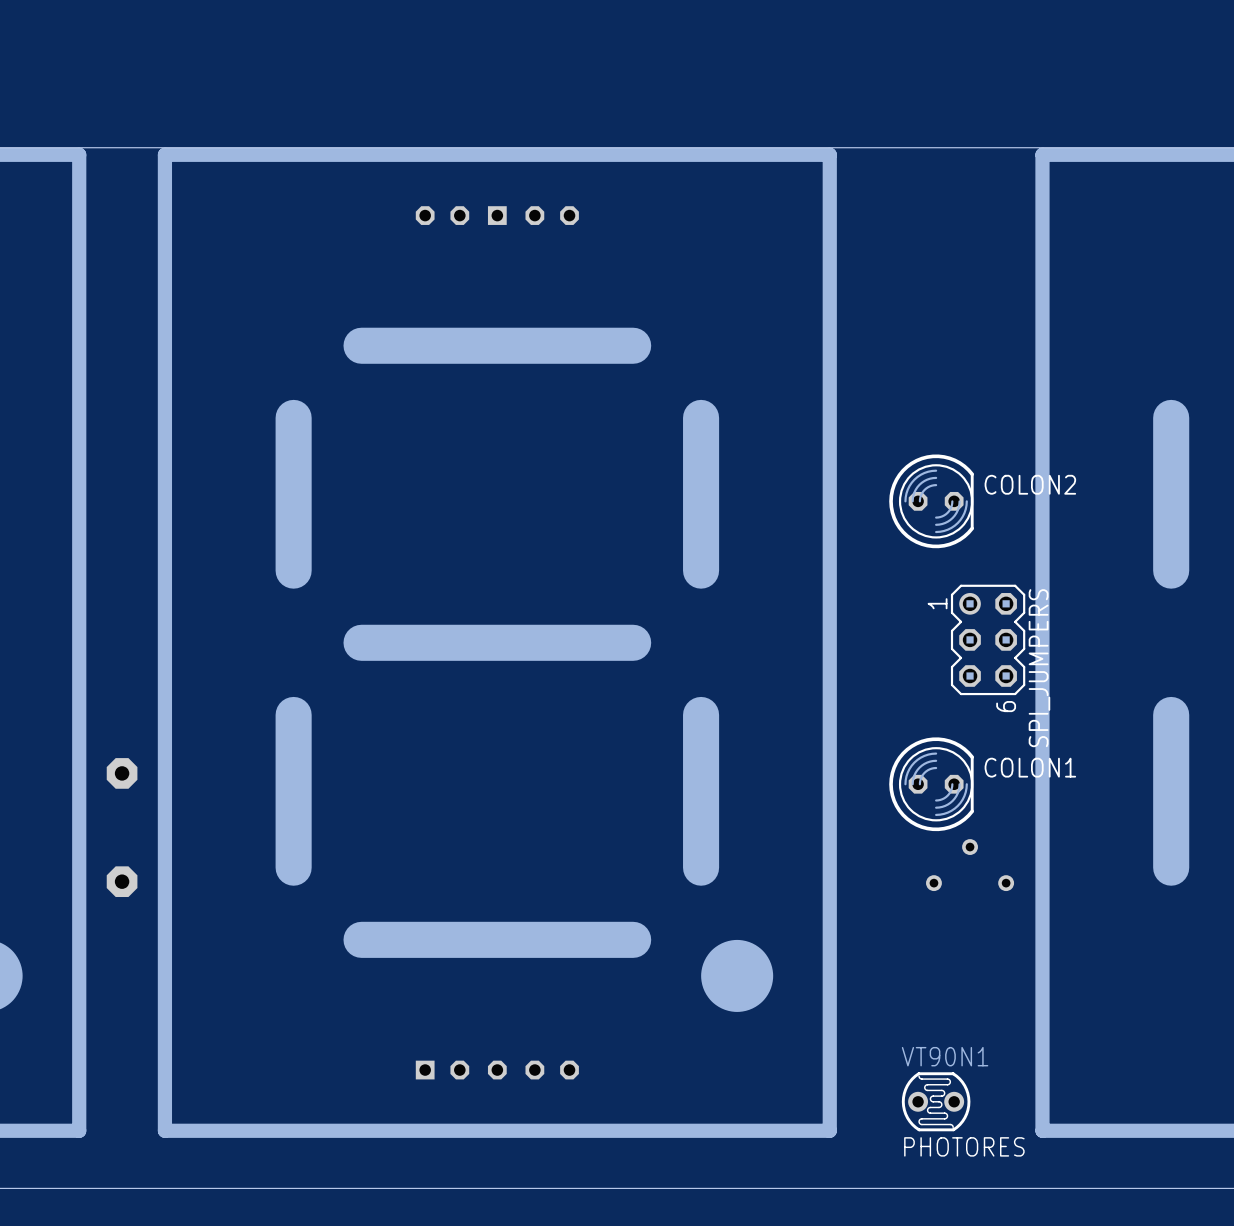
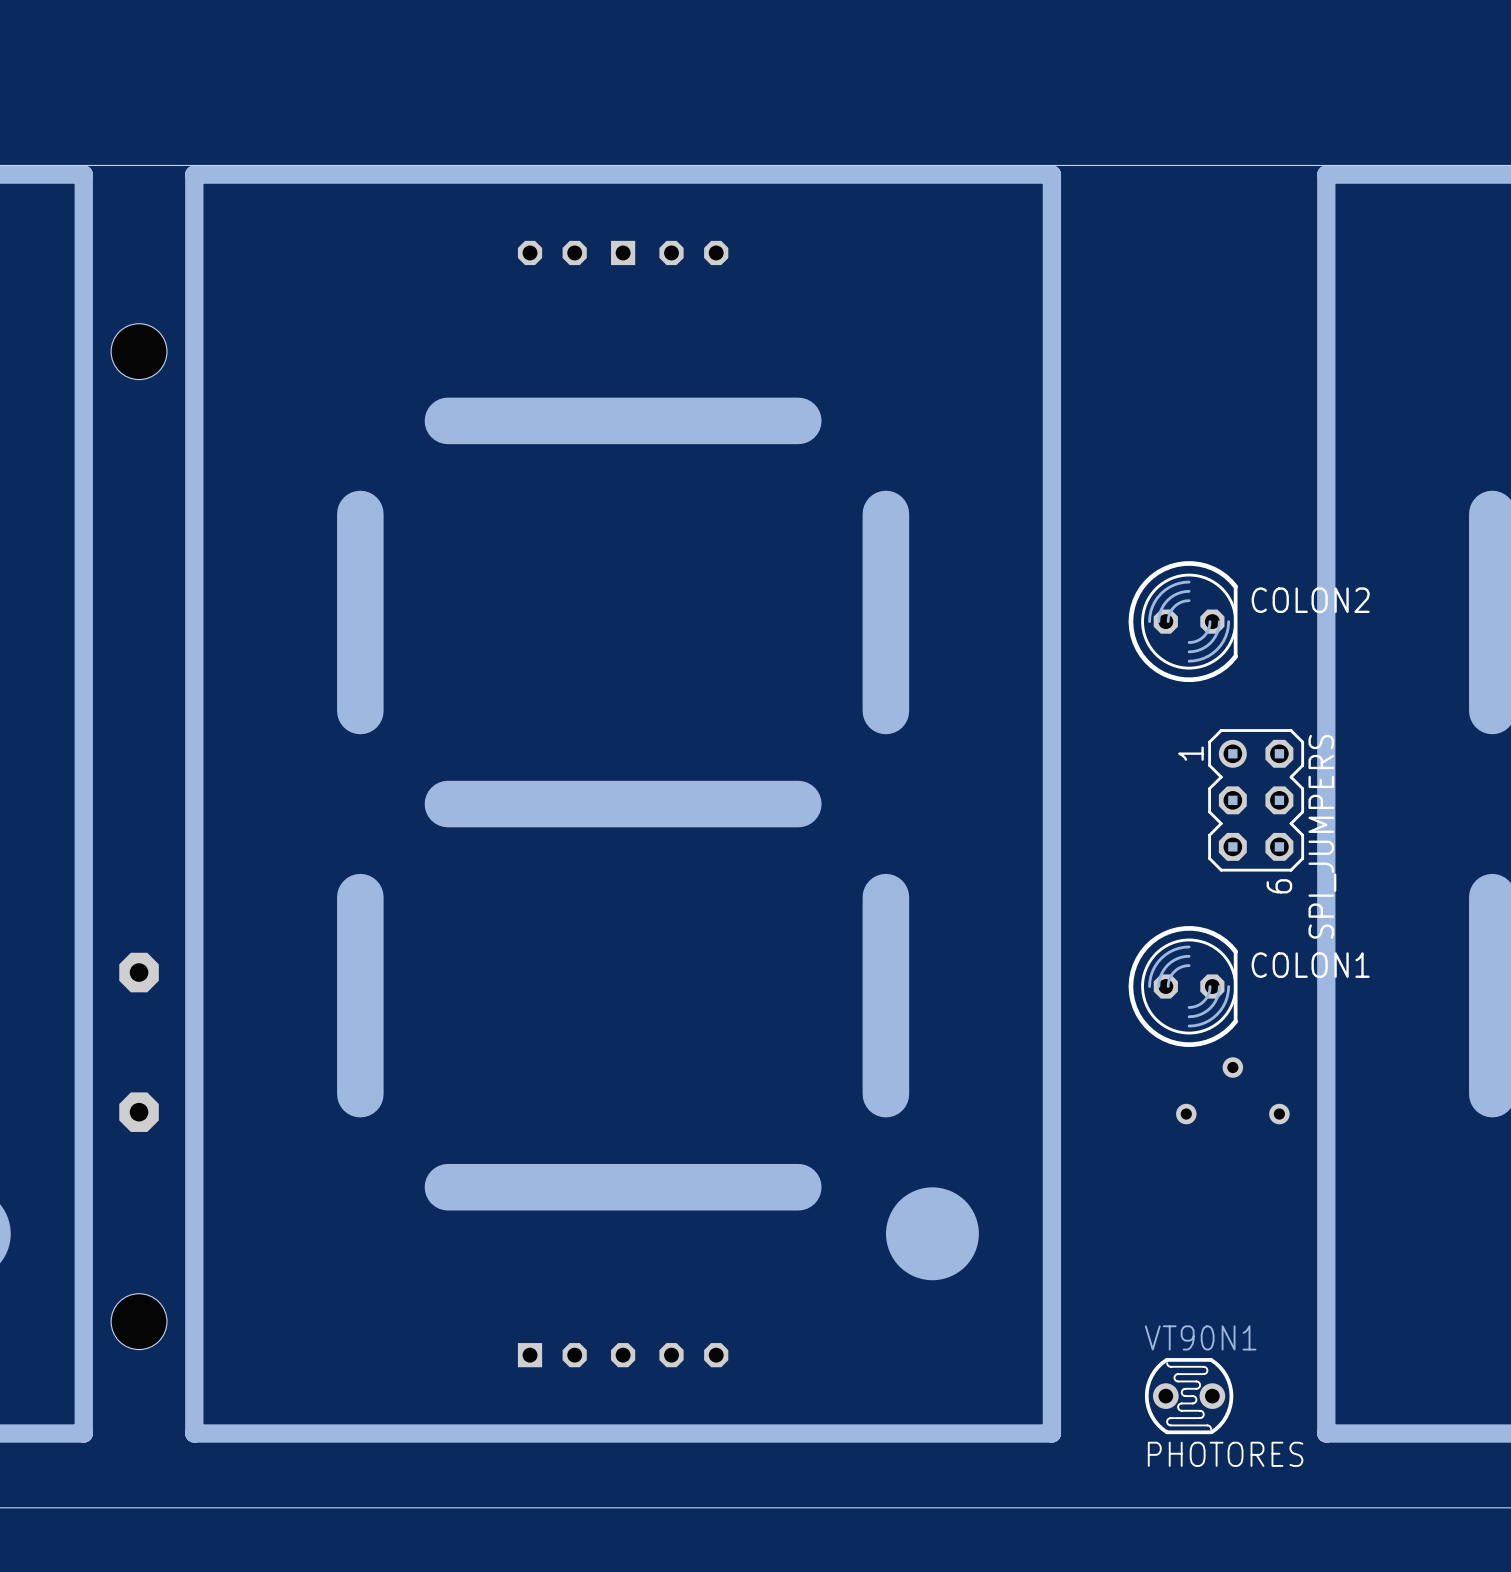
hole: none -> (139, 351)
hole: none -> (139, 1321)

